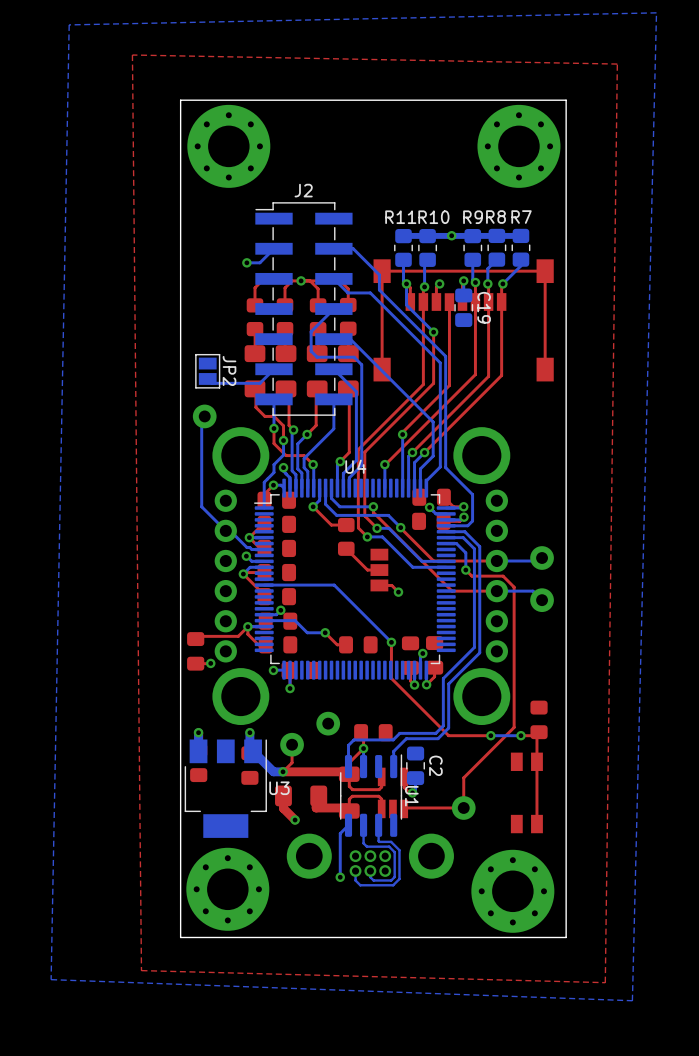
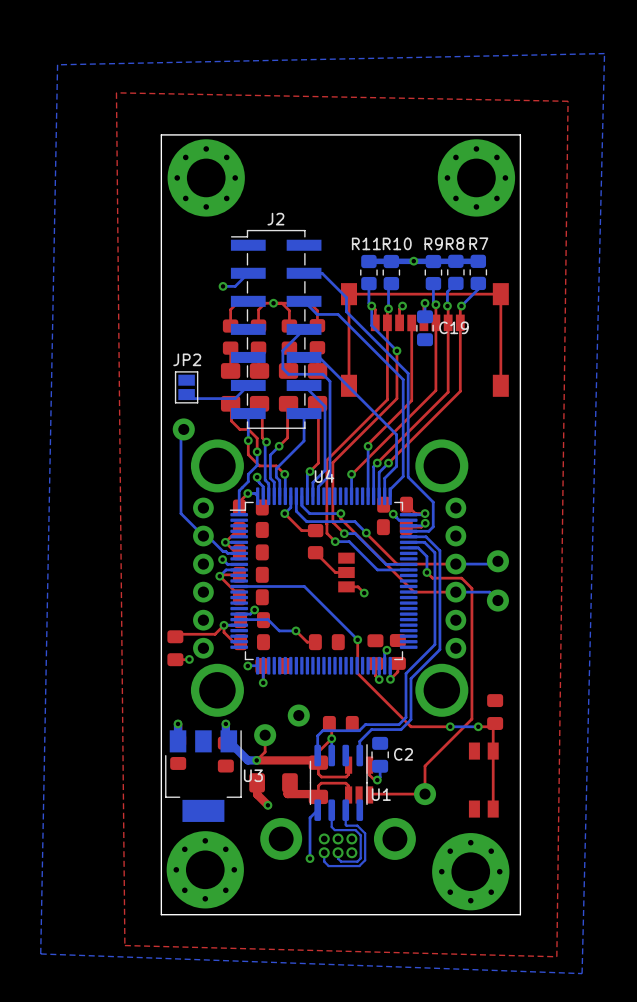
C19 name rotation: 0° (484, 307) -> 90° counterclockwise (453, 327)
JP2 name rotation: 0° (229, 370) -> 90° counterclockwise (187, 359)
C2 name rotation: 0° (435, 765) -> 90° counterclockwise (403, 754)
U1 name rotation: 0° (411, 796) -> 90° counterclockwise (381, 794)

